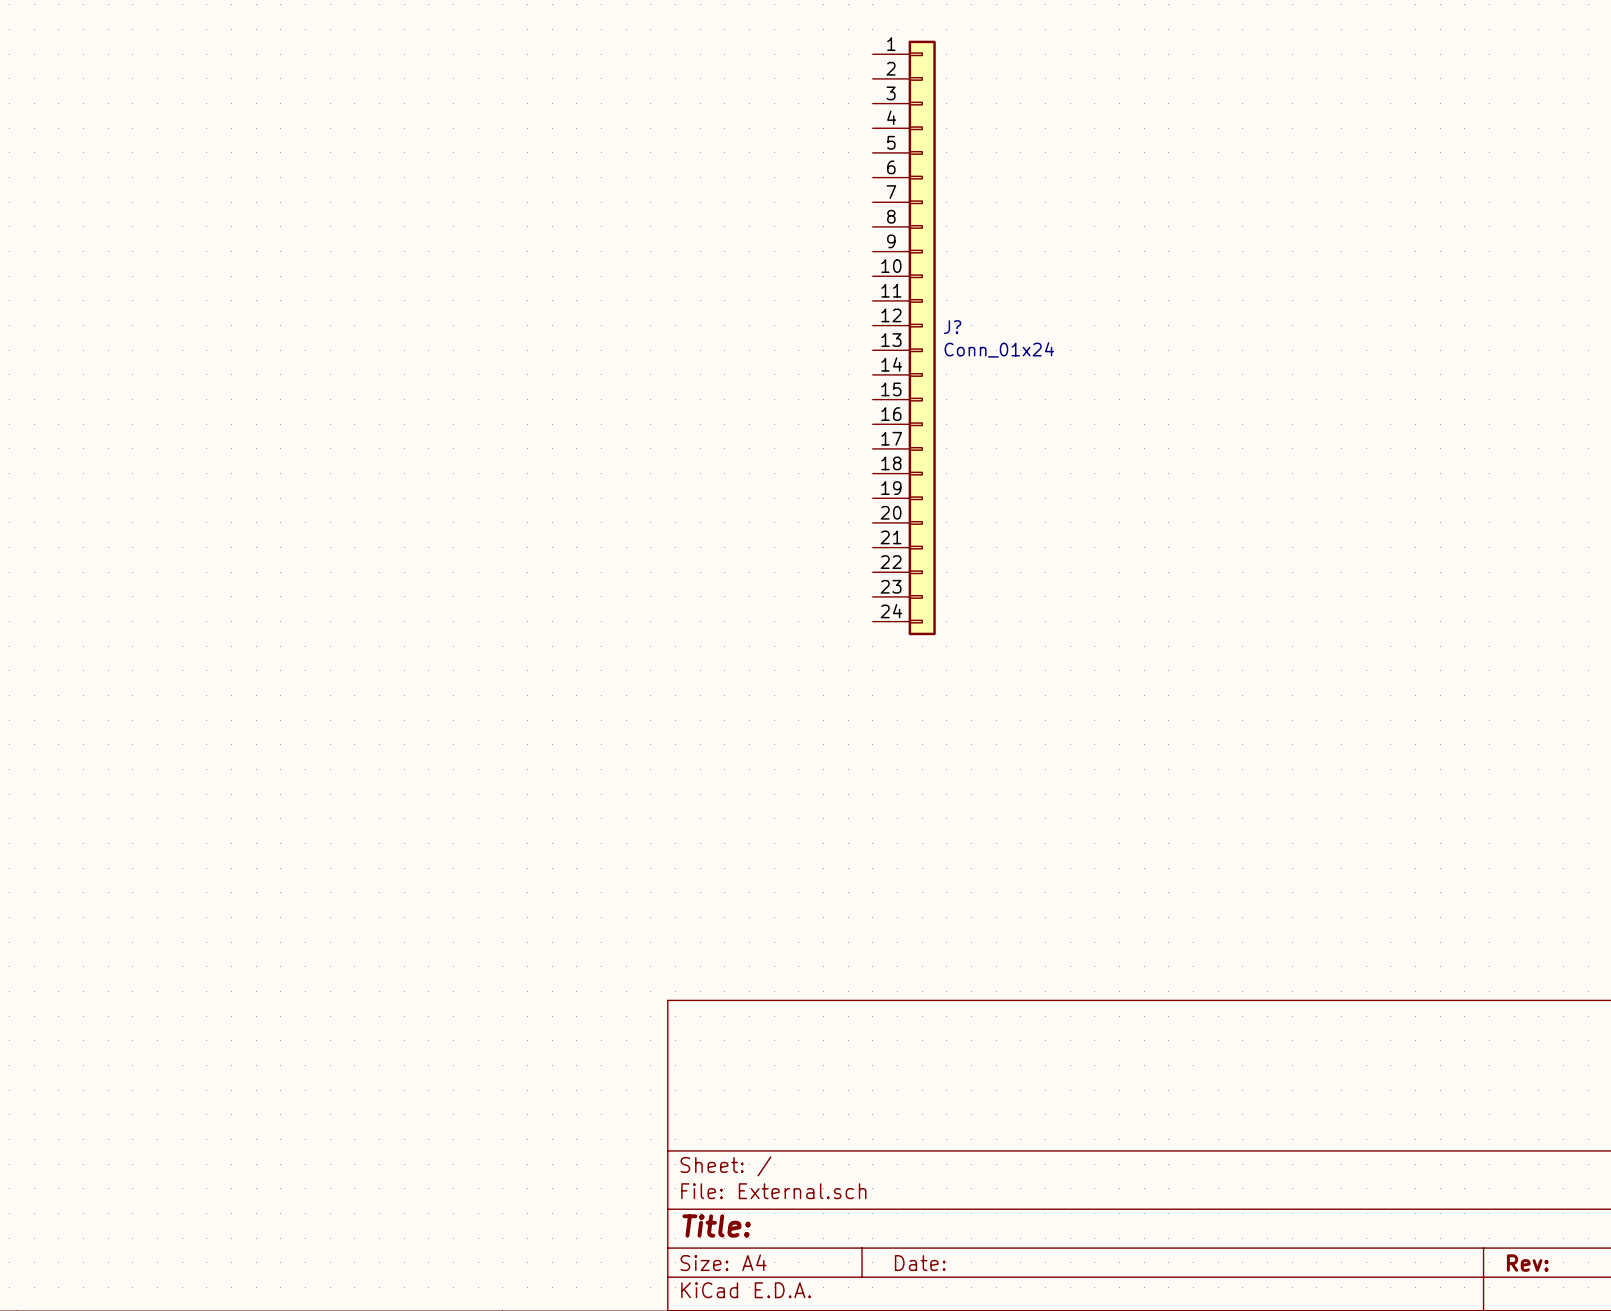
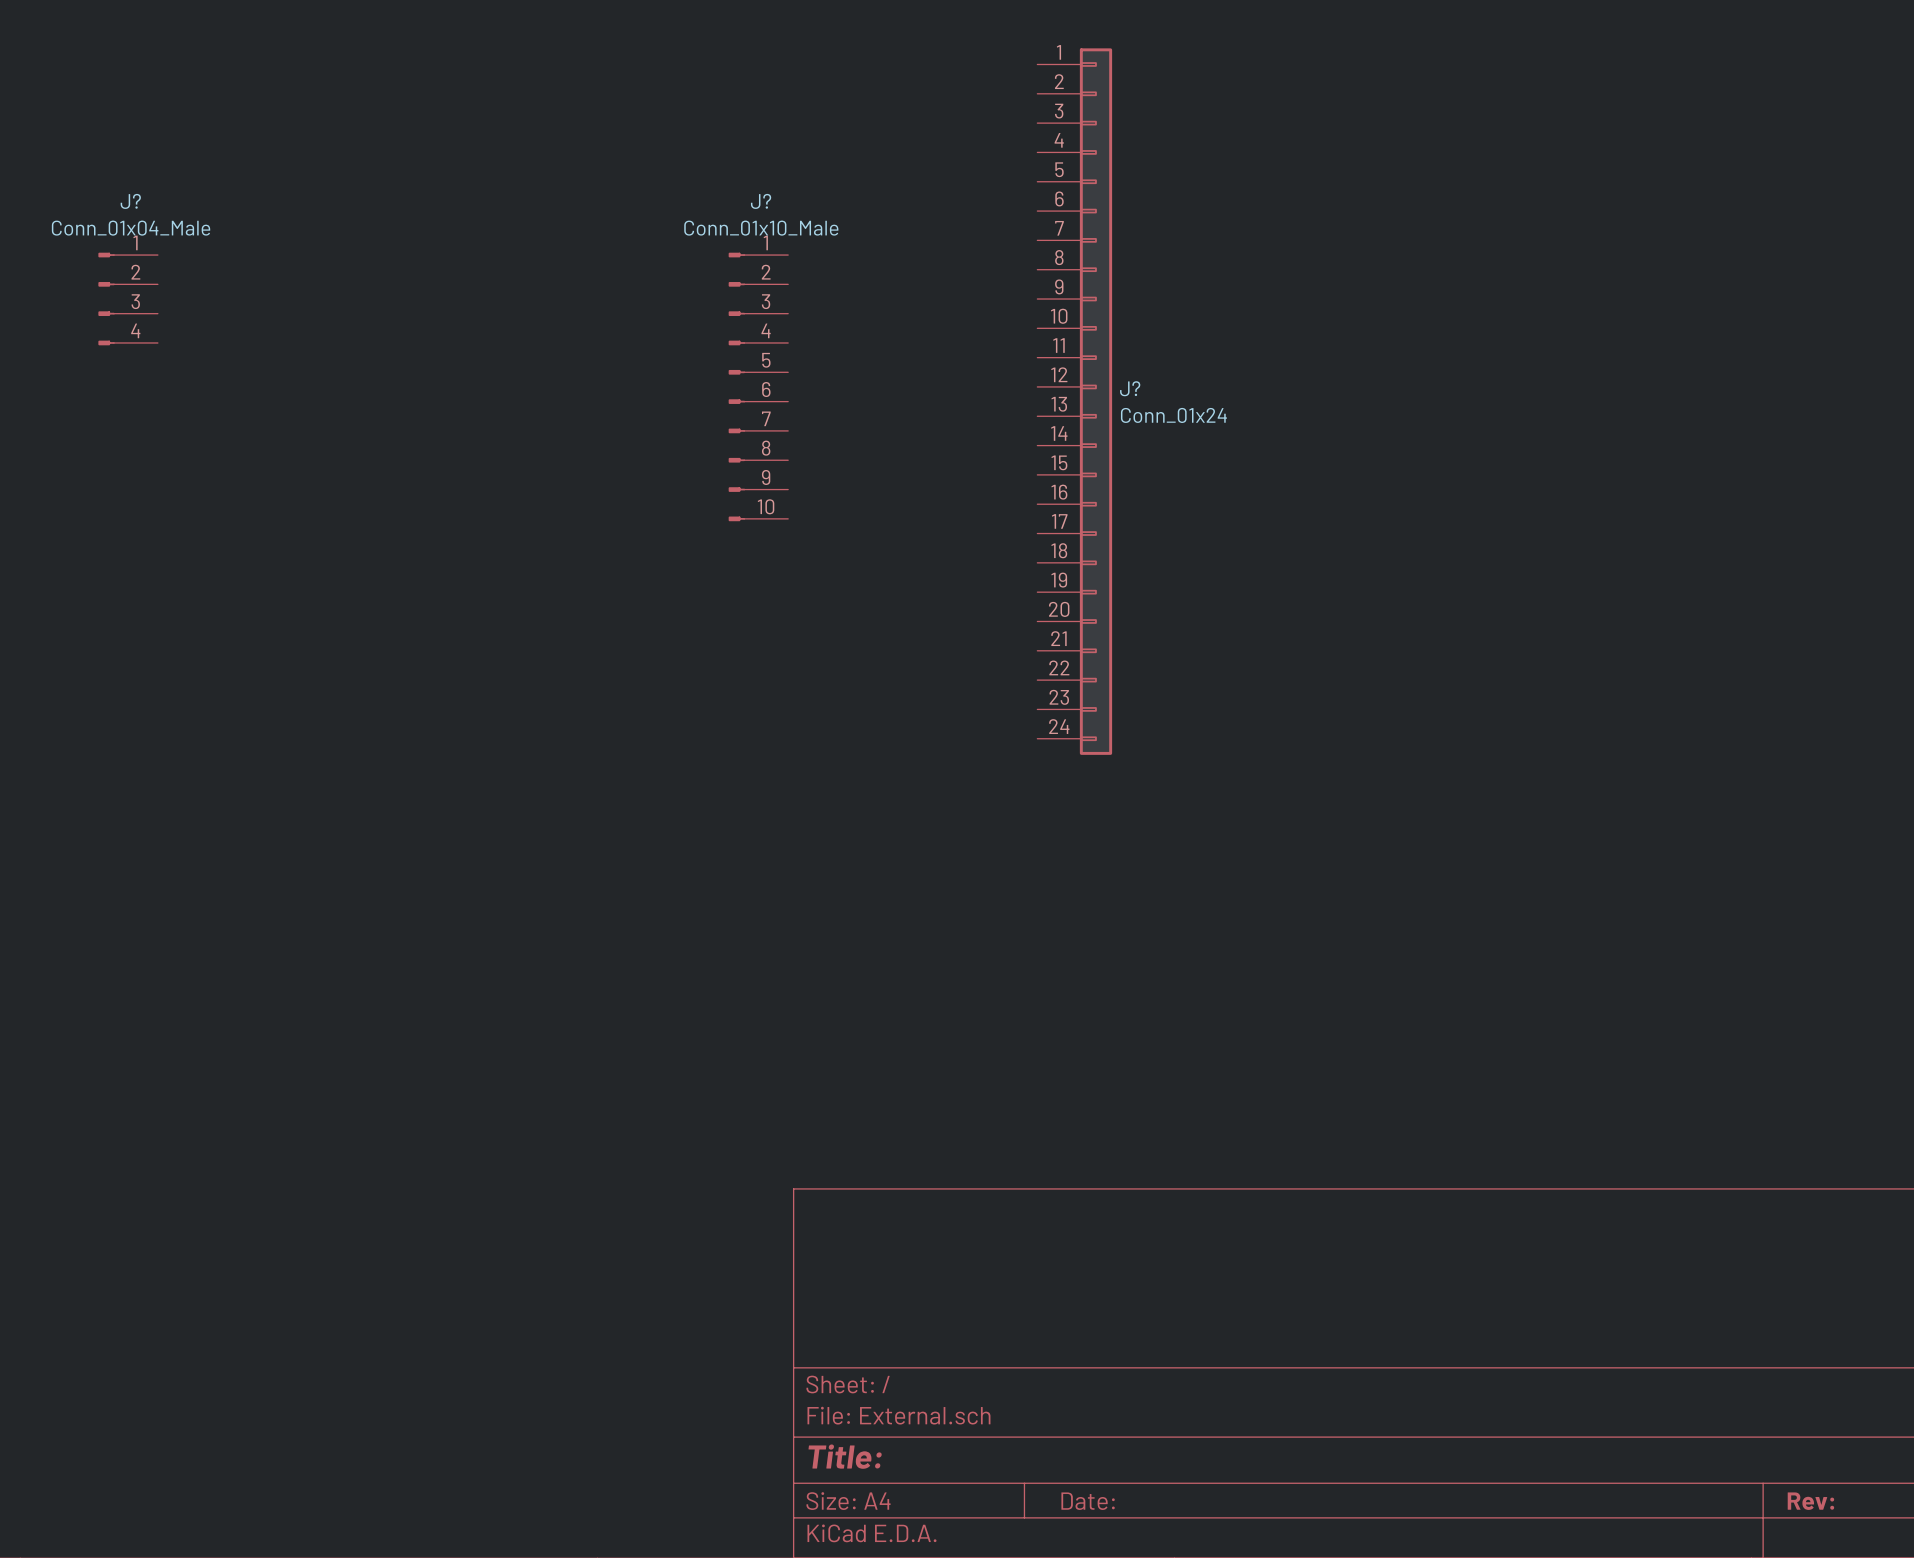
J?: none -> Conn_01x04_Male (128, 299)
J?: none -> Conn_01x10_Male (758, 386)

